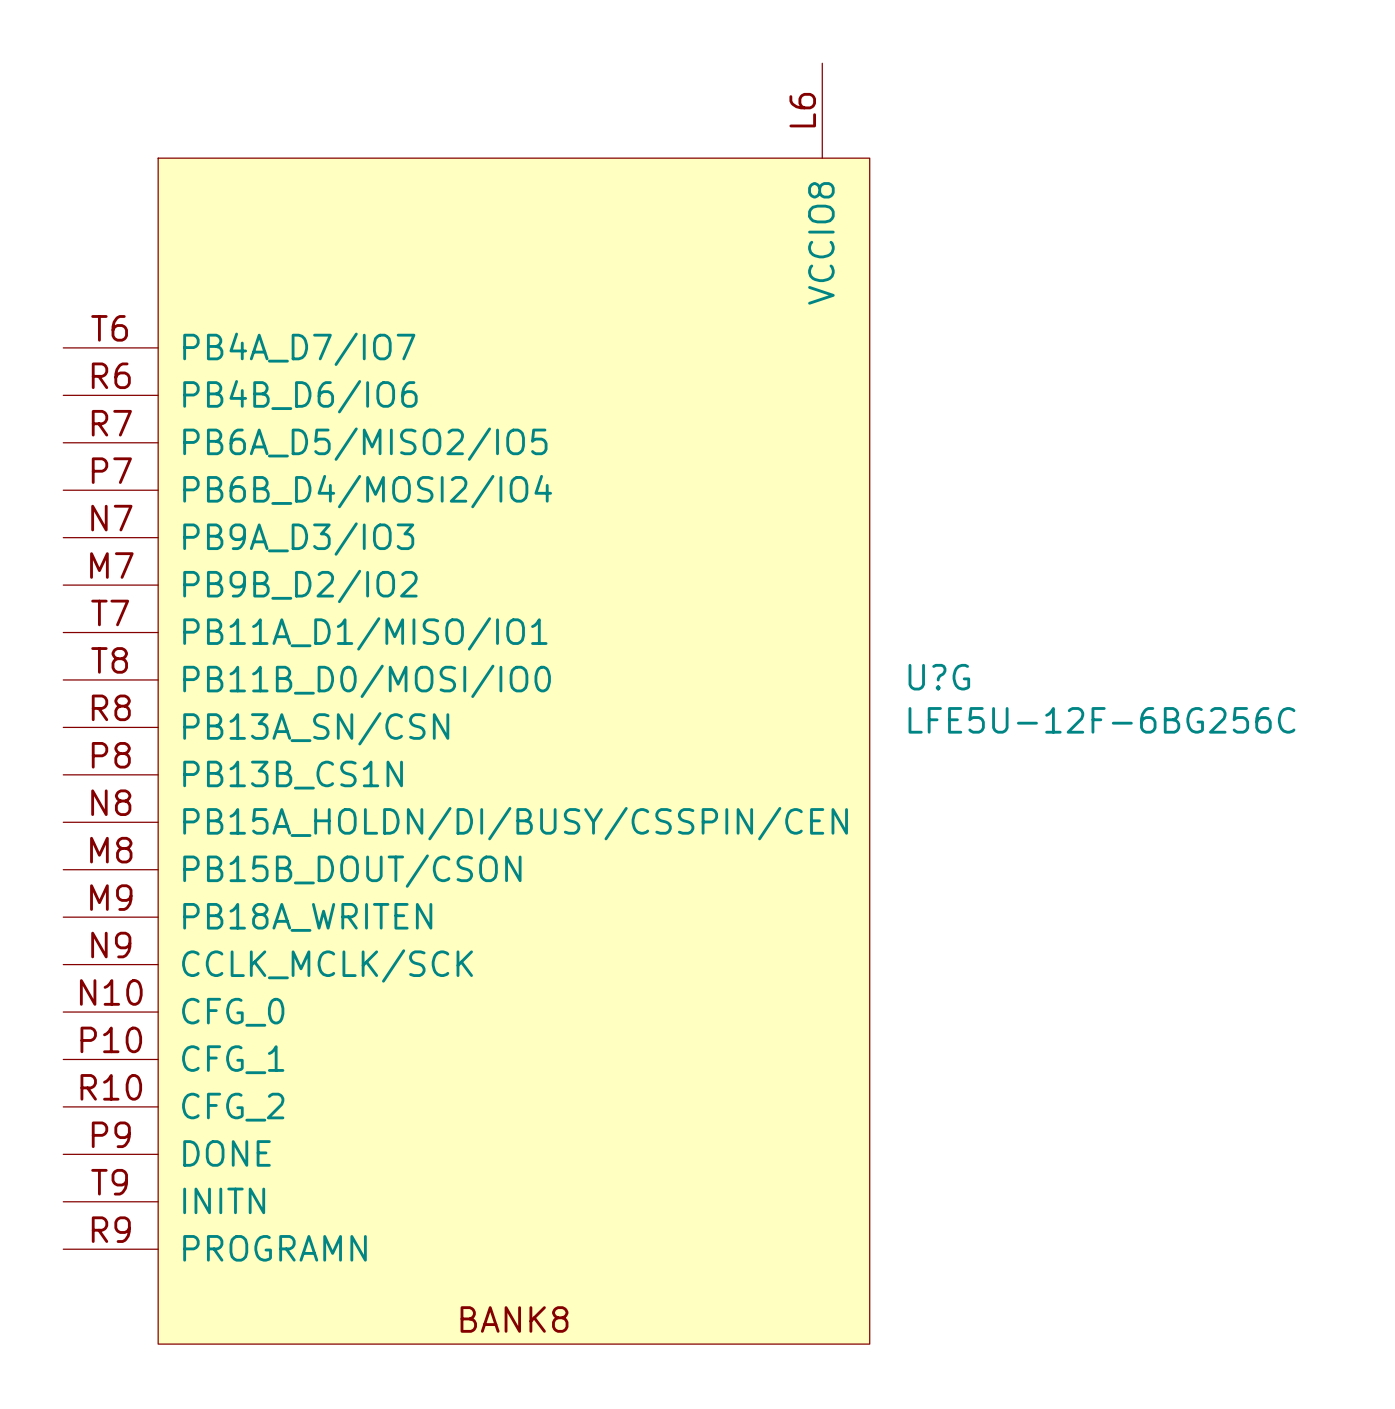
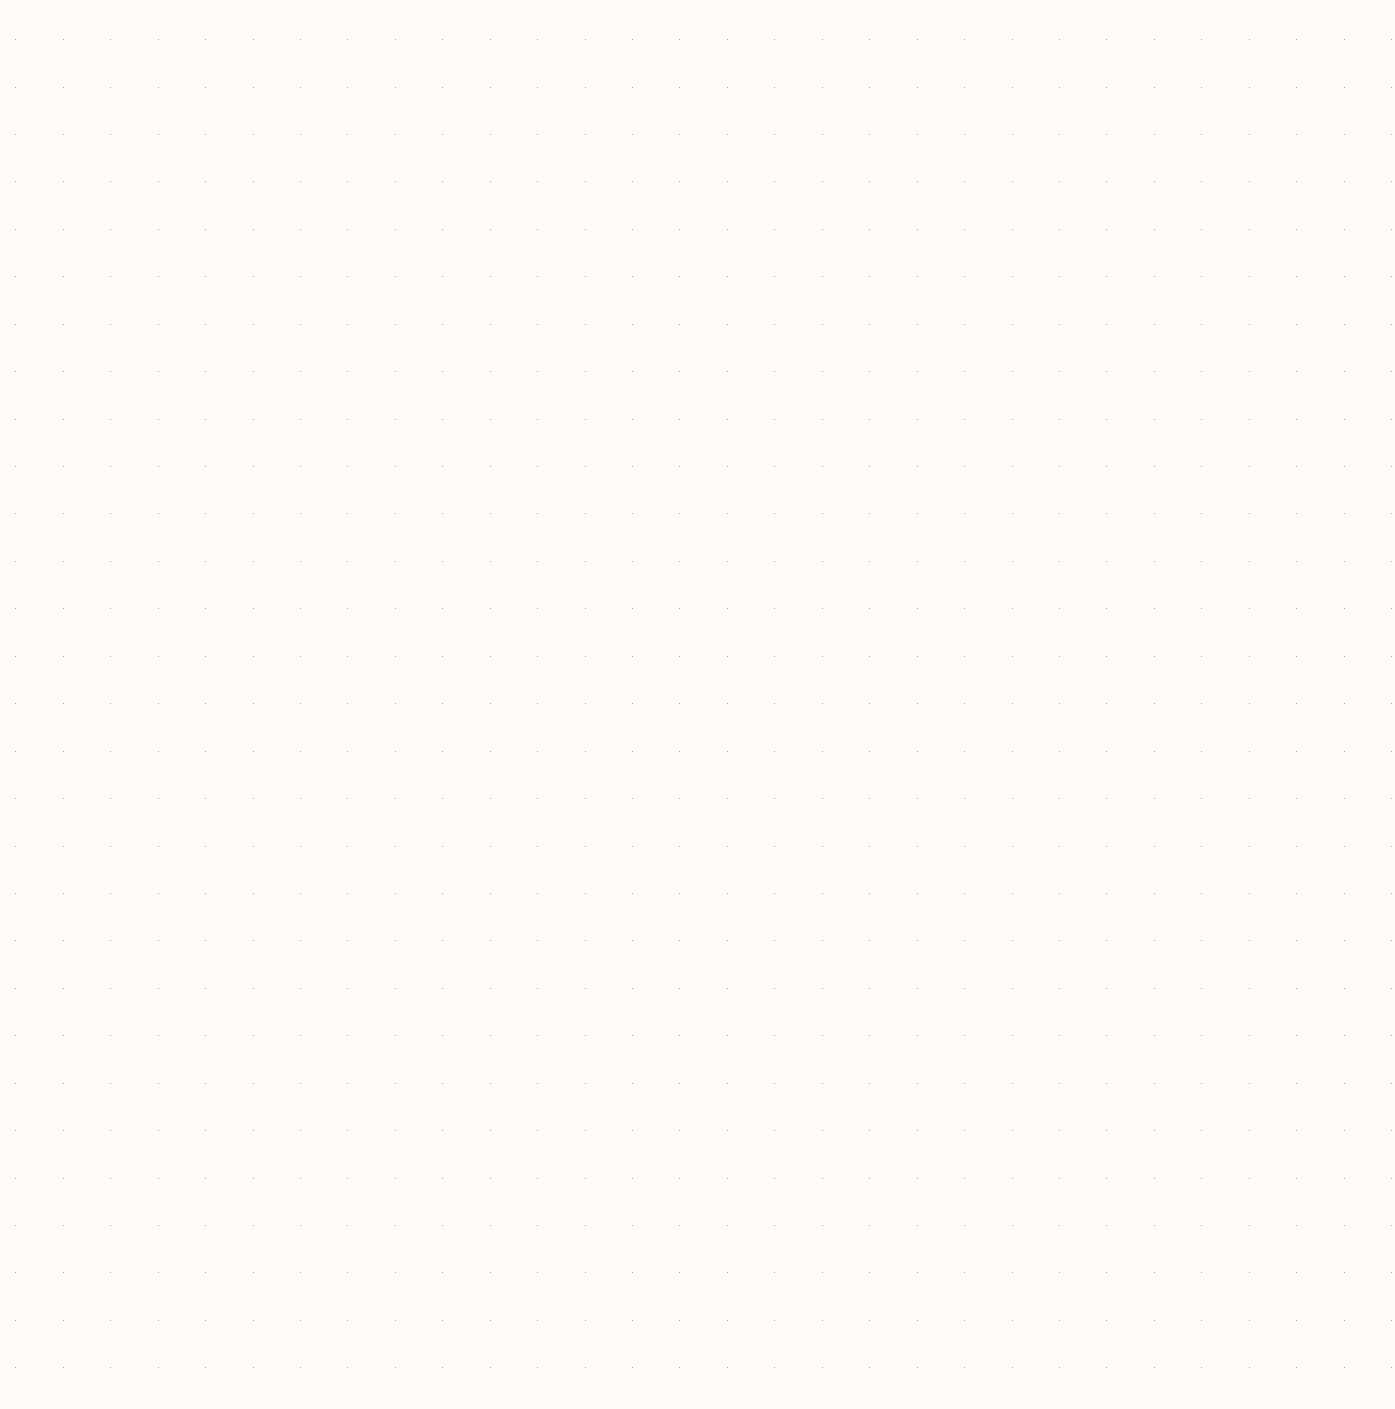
U?G: LFE5U-12F-6BG256C (466, 703) -> none

